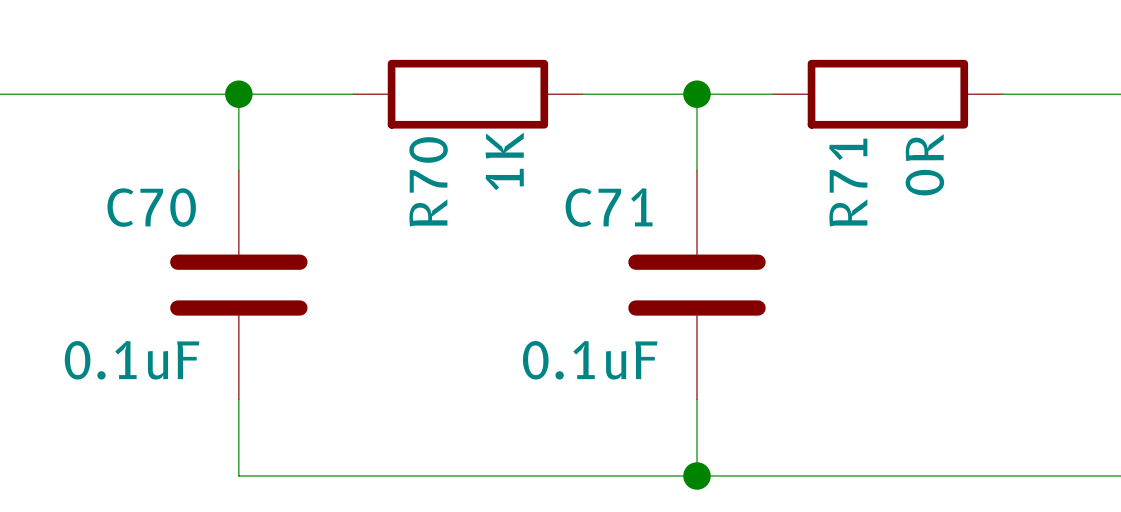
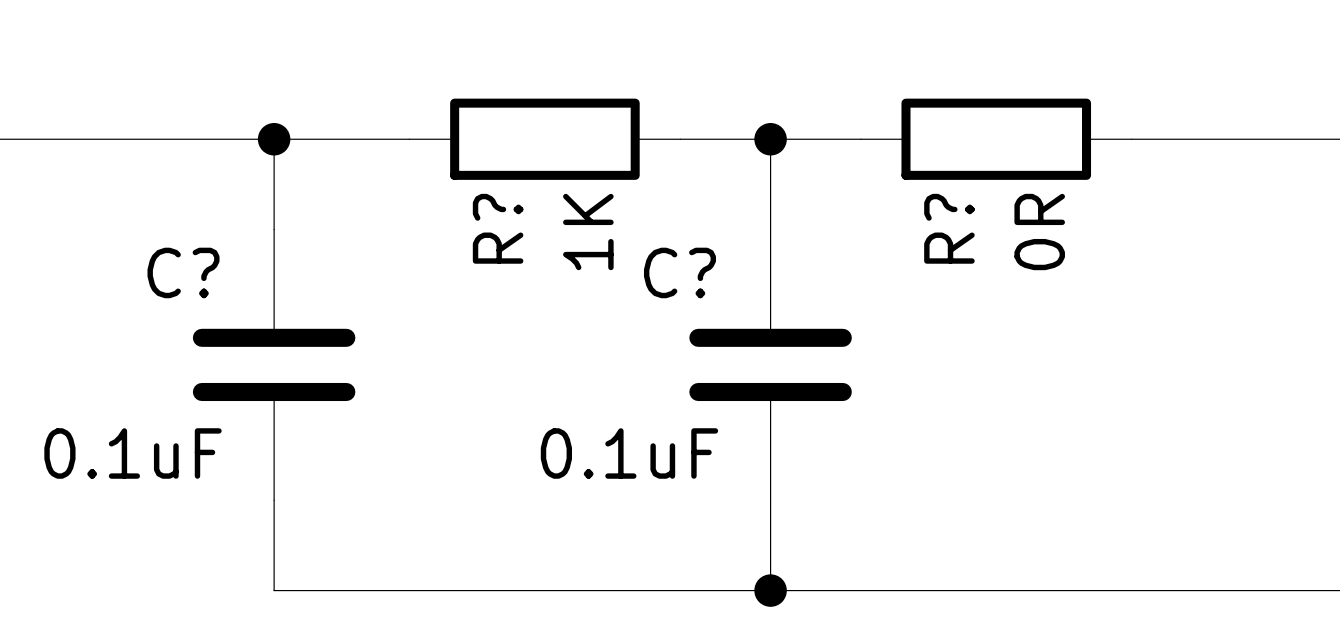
wire: (696, 94) (696, 170) -> (770, 139) (770, 229)
junction position: (696, 94) -> (770, 139)
R?: none -> 0R (996, 139)
R71: 0R (887, 94) -> none
R70 name: R70 (428, 181) -> R? (498, 228)
C70 name: C70 (151, 207) -> C? (183, 272)
C?: none -> 0.1uF (770, 364)
C71: 0.1uF (696, 285) -> none
wire: (696, 399) (696, 475) -> (770, 500) (770, 590)
junction position: (696, 475) -> (770, 590)

